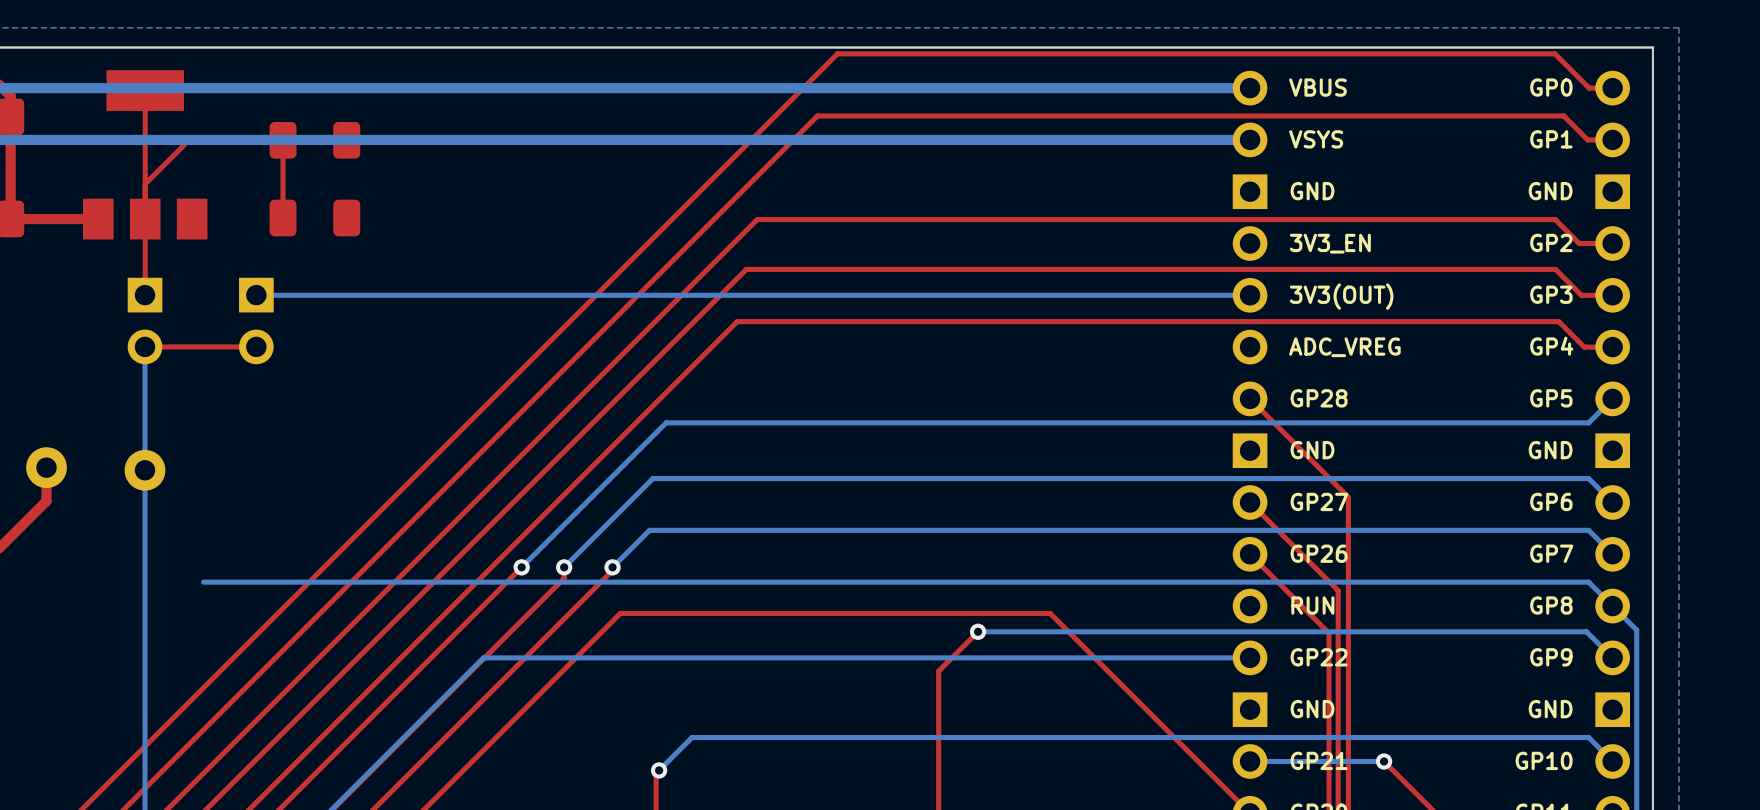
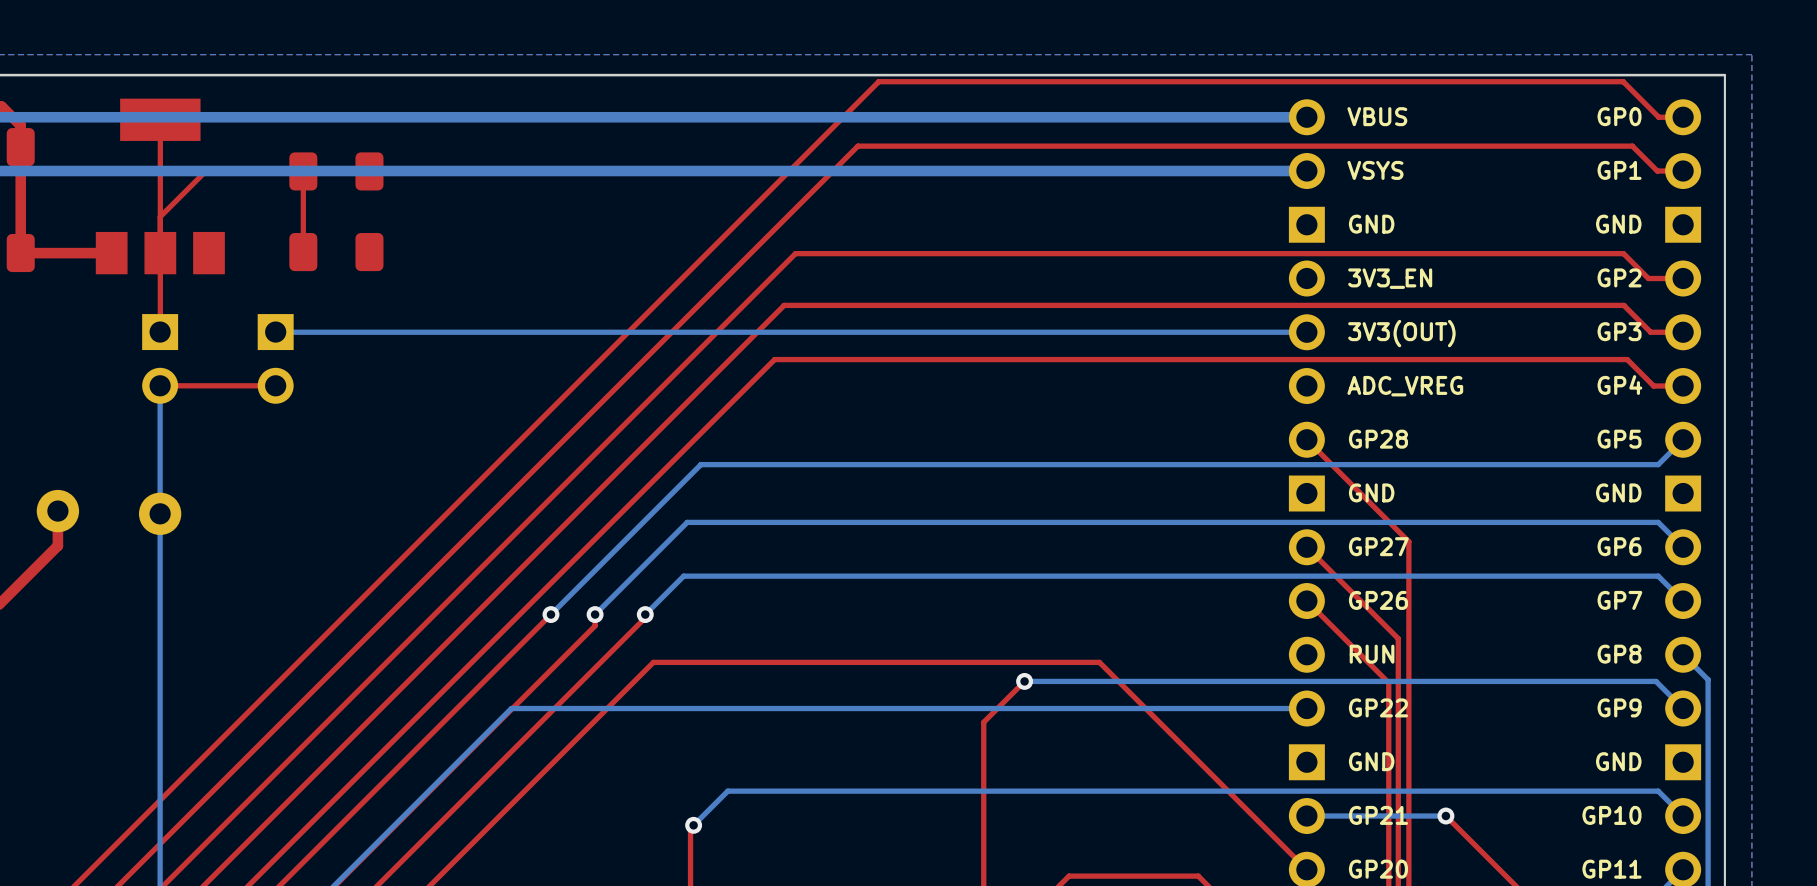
bottom track: (203, 582) (1588, 582) (1612, 606) -> none

